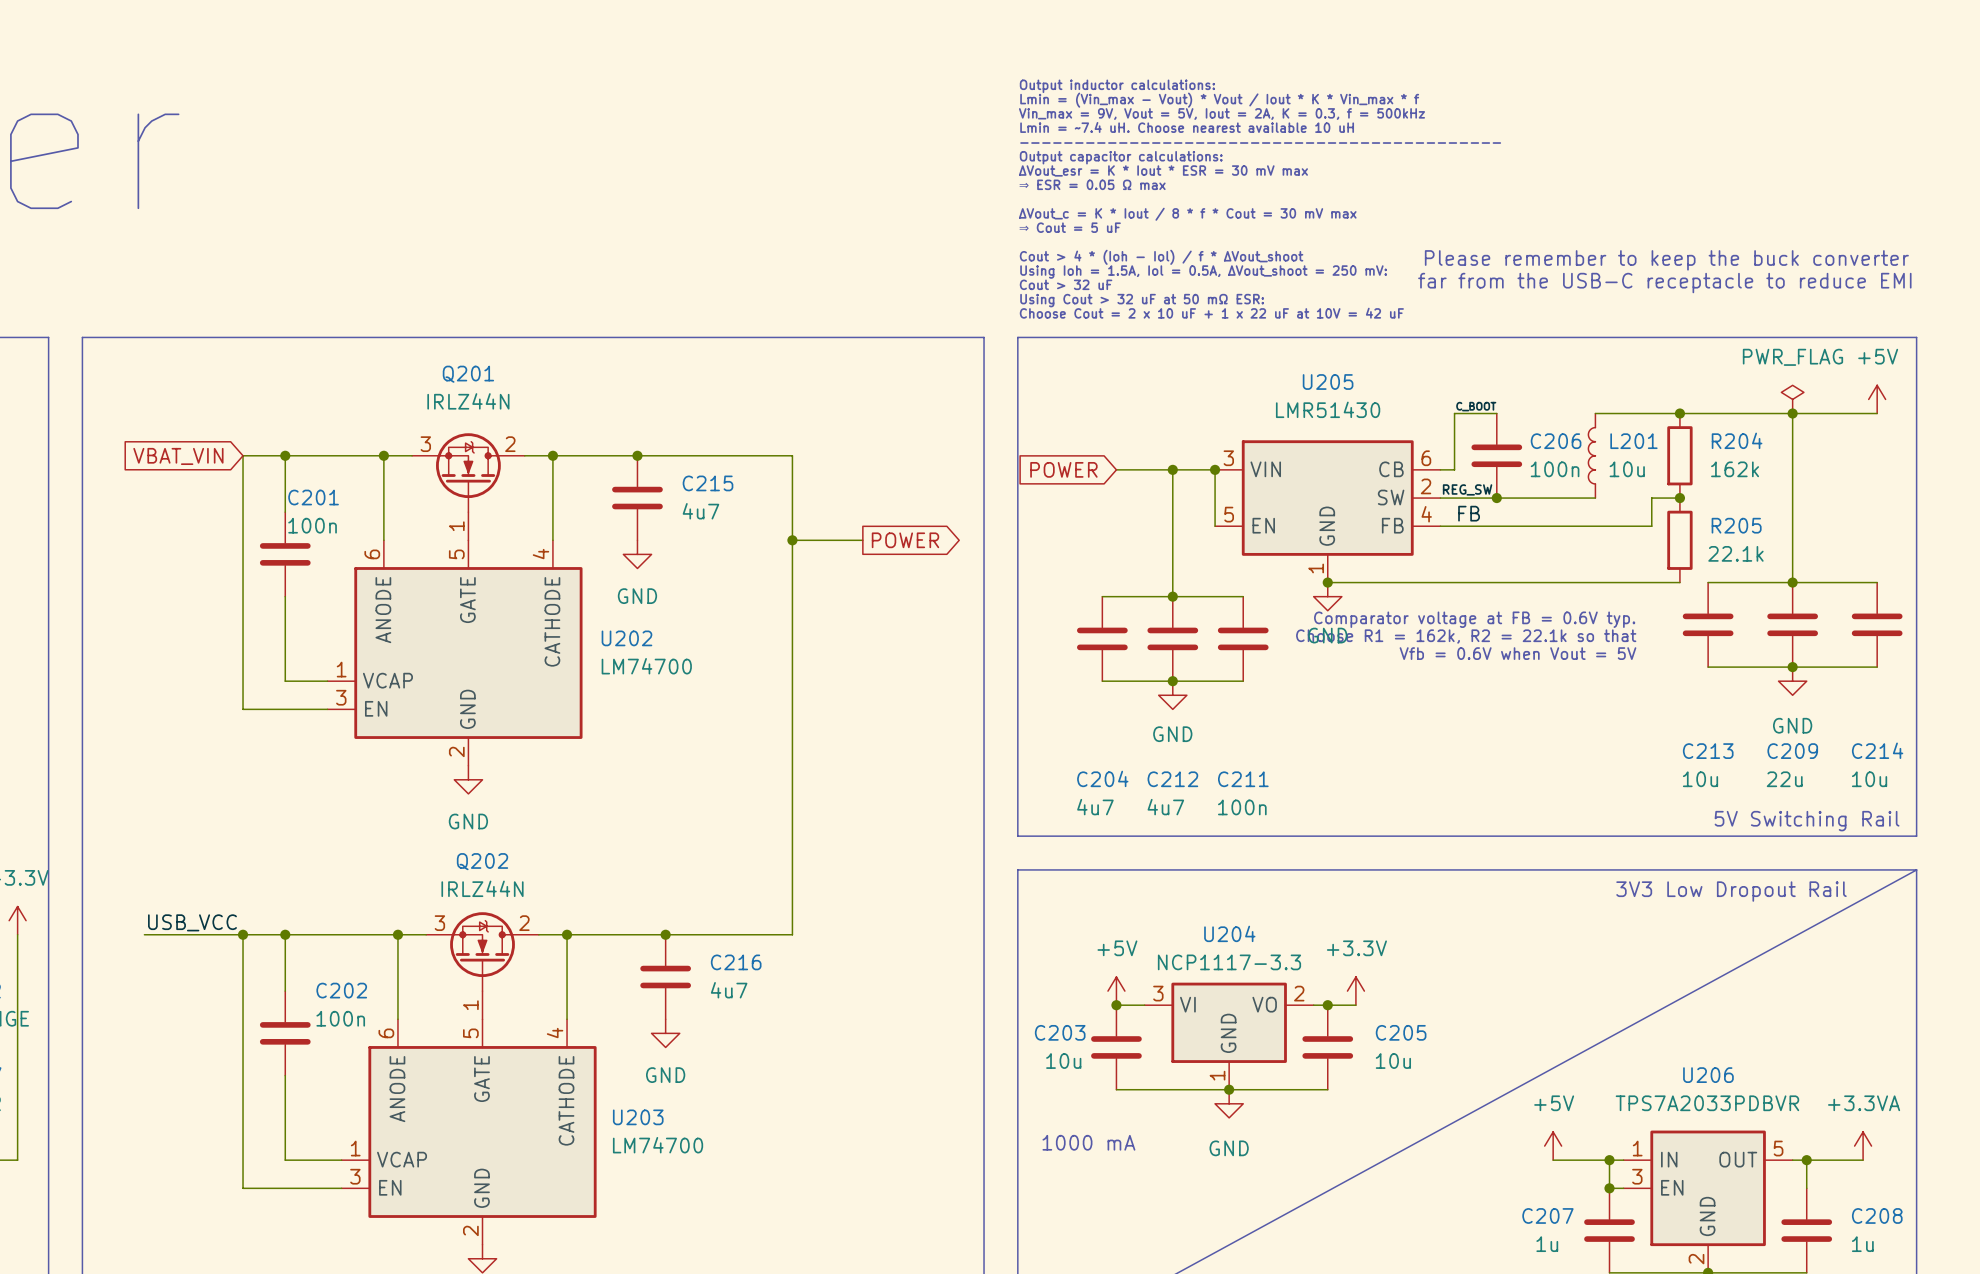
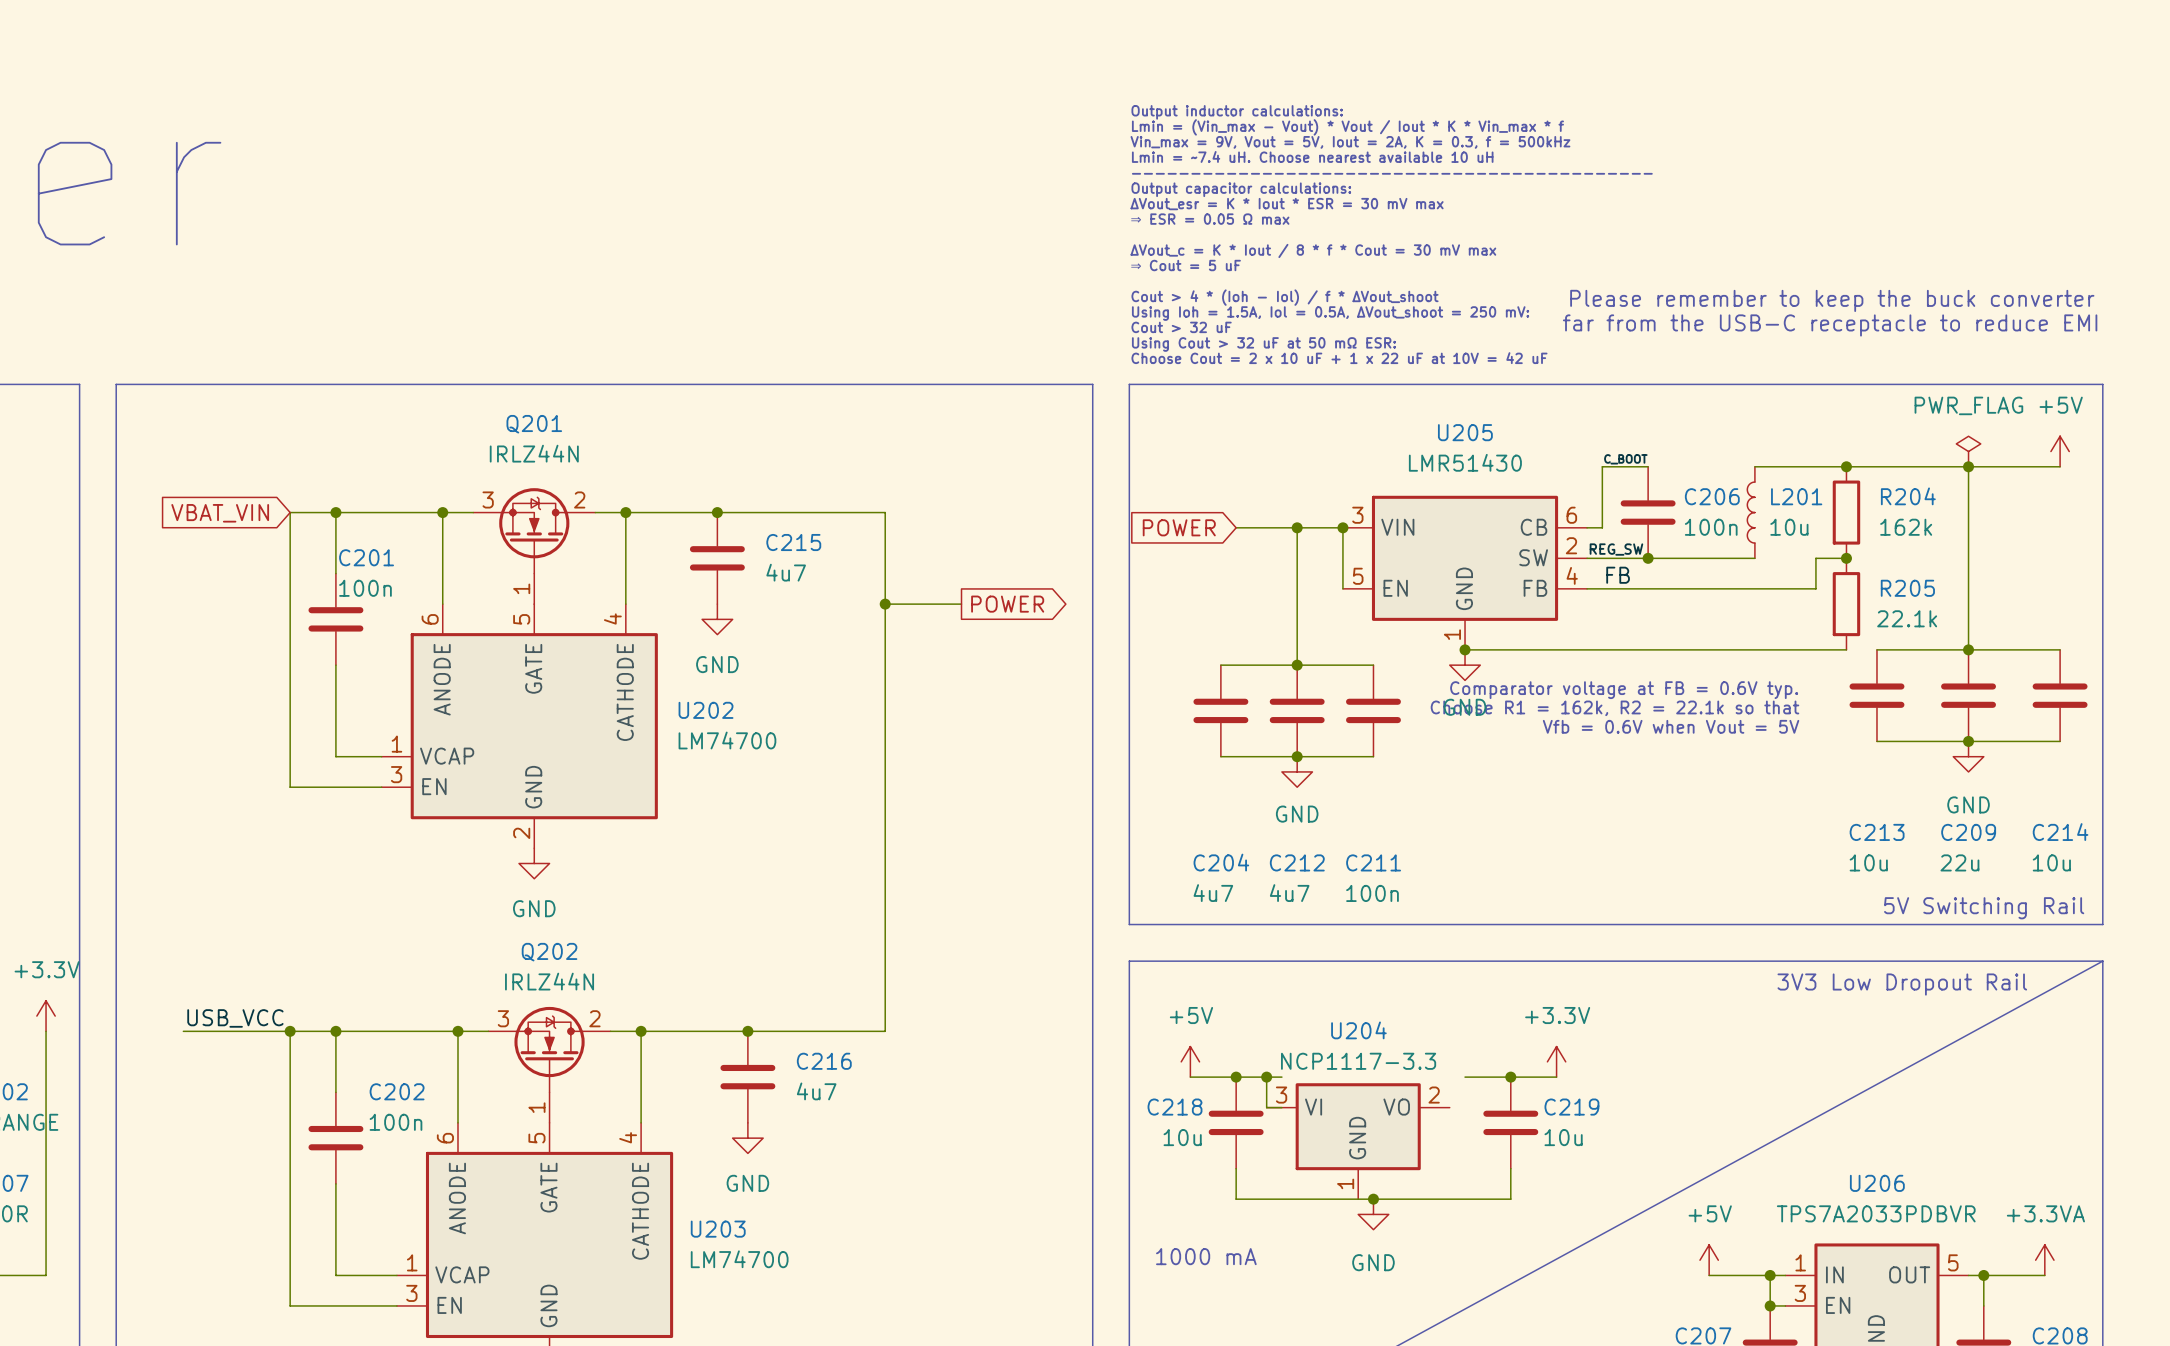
wire: none -> (1190, 1077) (1281, 1077)
junction: none -> (1236, 1077)
wire: none -> (1266, 1077) (1266, 1107) (1281, 1107)
junction: none -> (1266, 1077)
wire: none -> (1465, 1077) (1556, 1077)
power symbol position: +5V (1116, 991) -> +5V (1190, 1061)
power symbol position: +3.3V (1355, 991) -> +3.3V (1556, 1061)
wire: (1116, 1005) (1144, 1005) -> none
junction: (1116, 1005) -> none
wire: (1313, 1005) (1355, 1005) -> none
junction position: (1327, 1005) -> (1510, 1077)
C218: none -> 10u (1236, 1122)
C219: none -> 10u (1510, 1122)
C203: 10u (1116, 1047) -> none
C205: 10u (1327, 1047) -> none
wire: none -> (1510, 1168) (1510, 1199) (1465, 1199)
junction position: (1229, 1089) -> (1373, 1199)
power symbol position: GND (1229, 1103) -> GND (1373, 1214)

